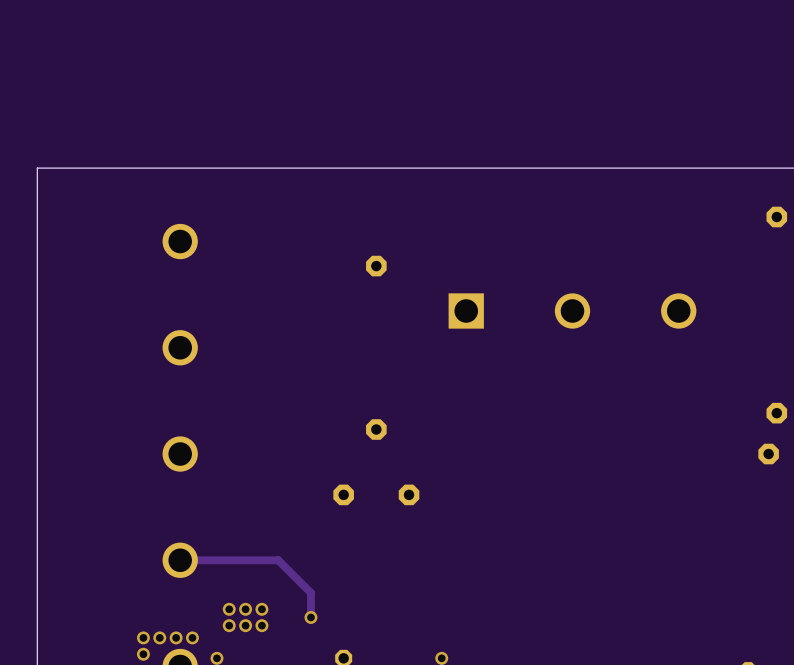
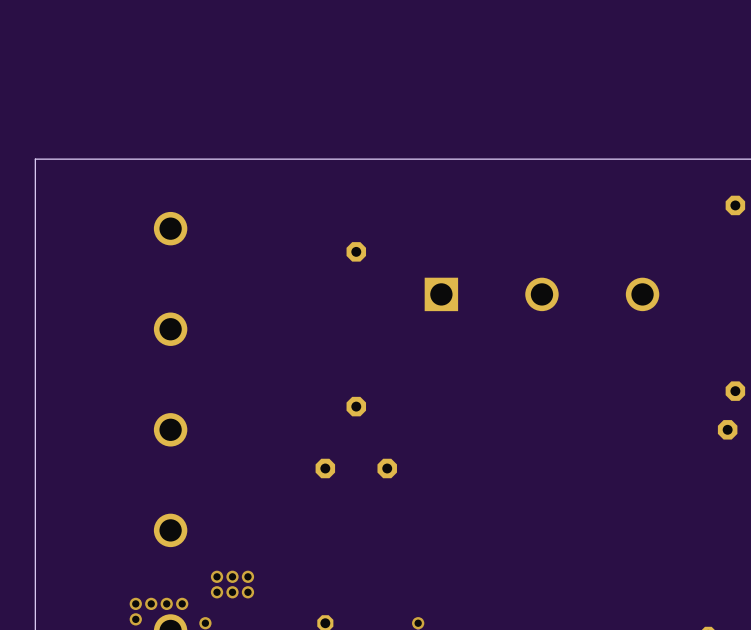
track: (180, 560) (278, 560) (310, 592) (310, 617) -> none
via: (310, 617) -> none

